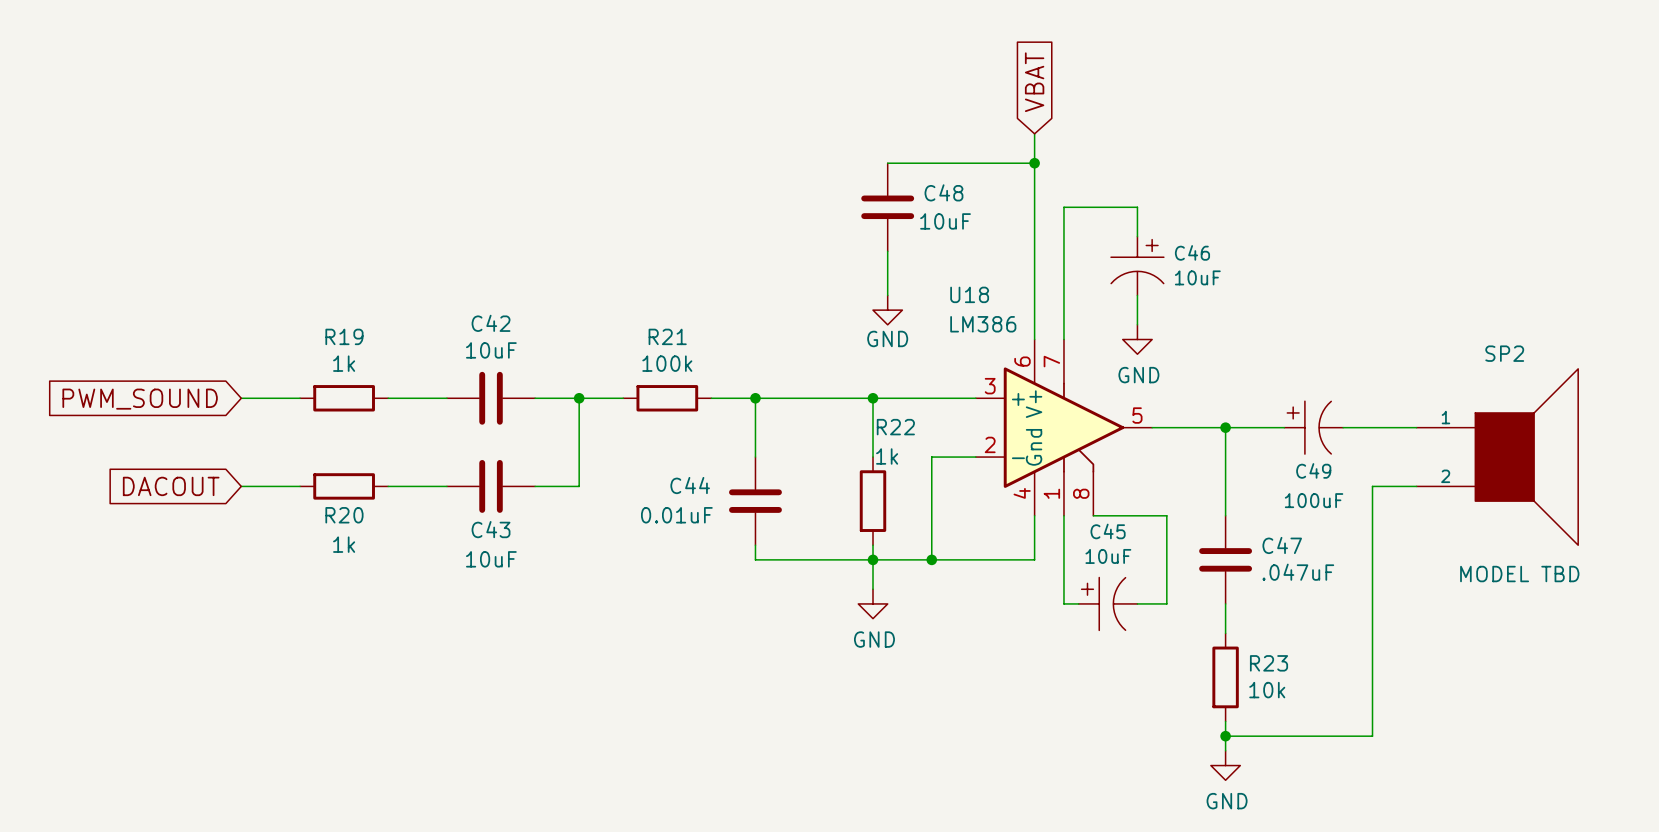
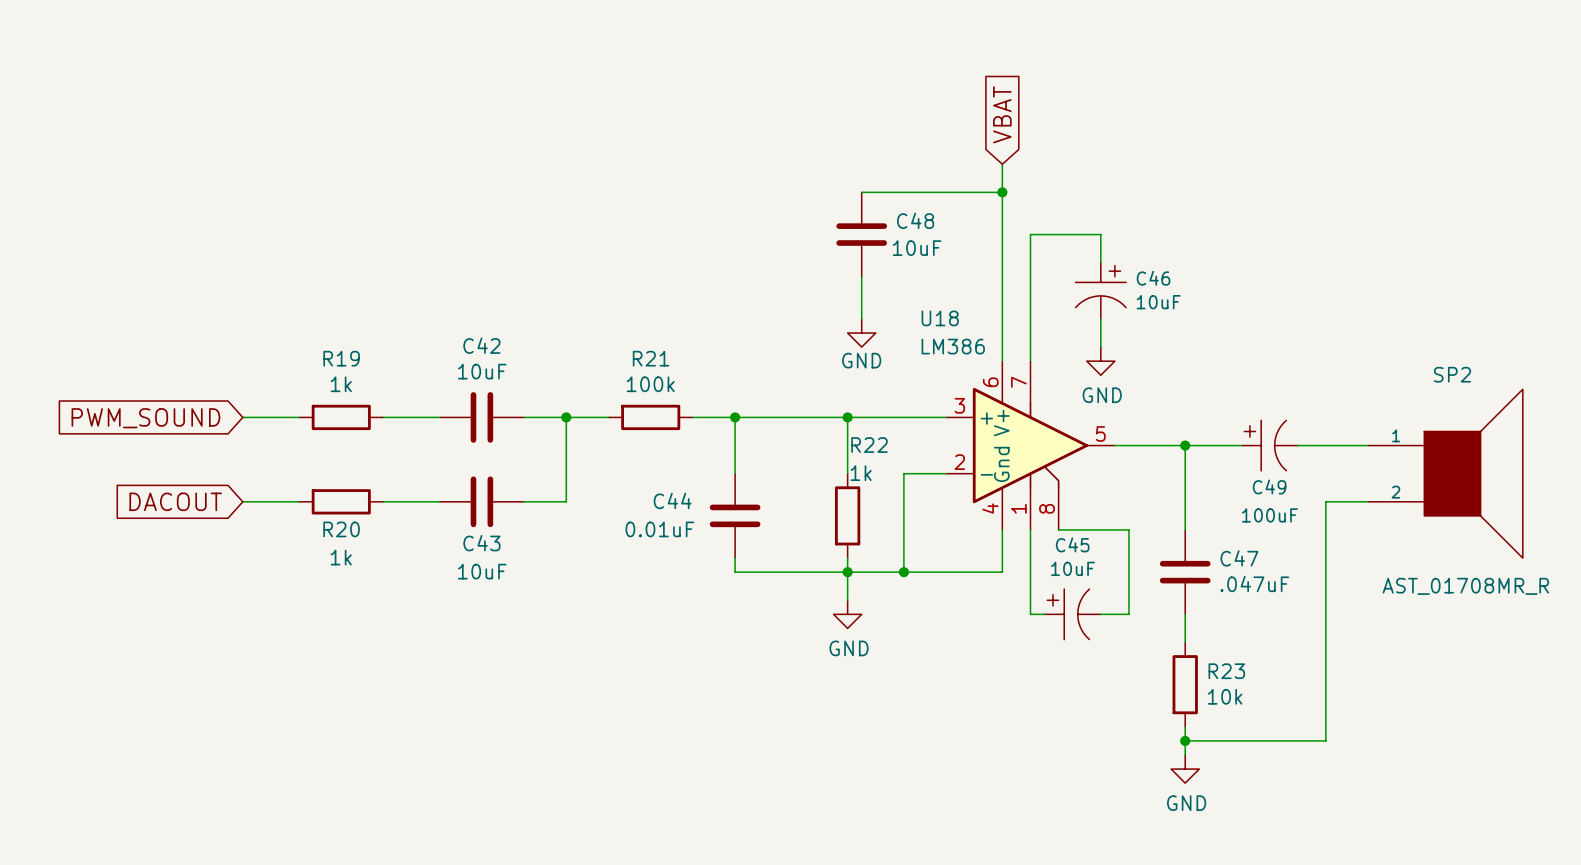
SP2 value: MODEL TBD (1519, 574) -> AST_01708MR_R (1465, 586)

